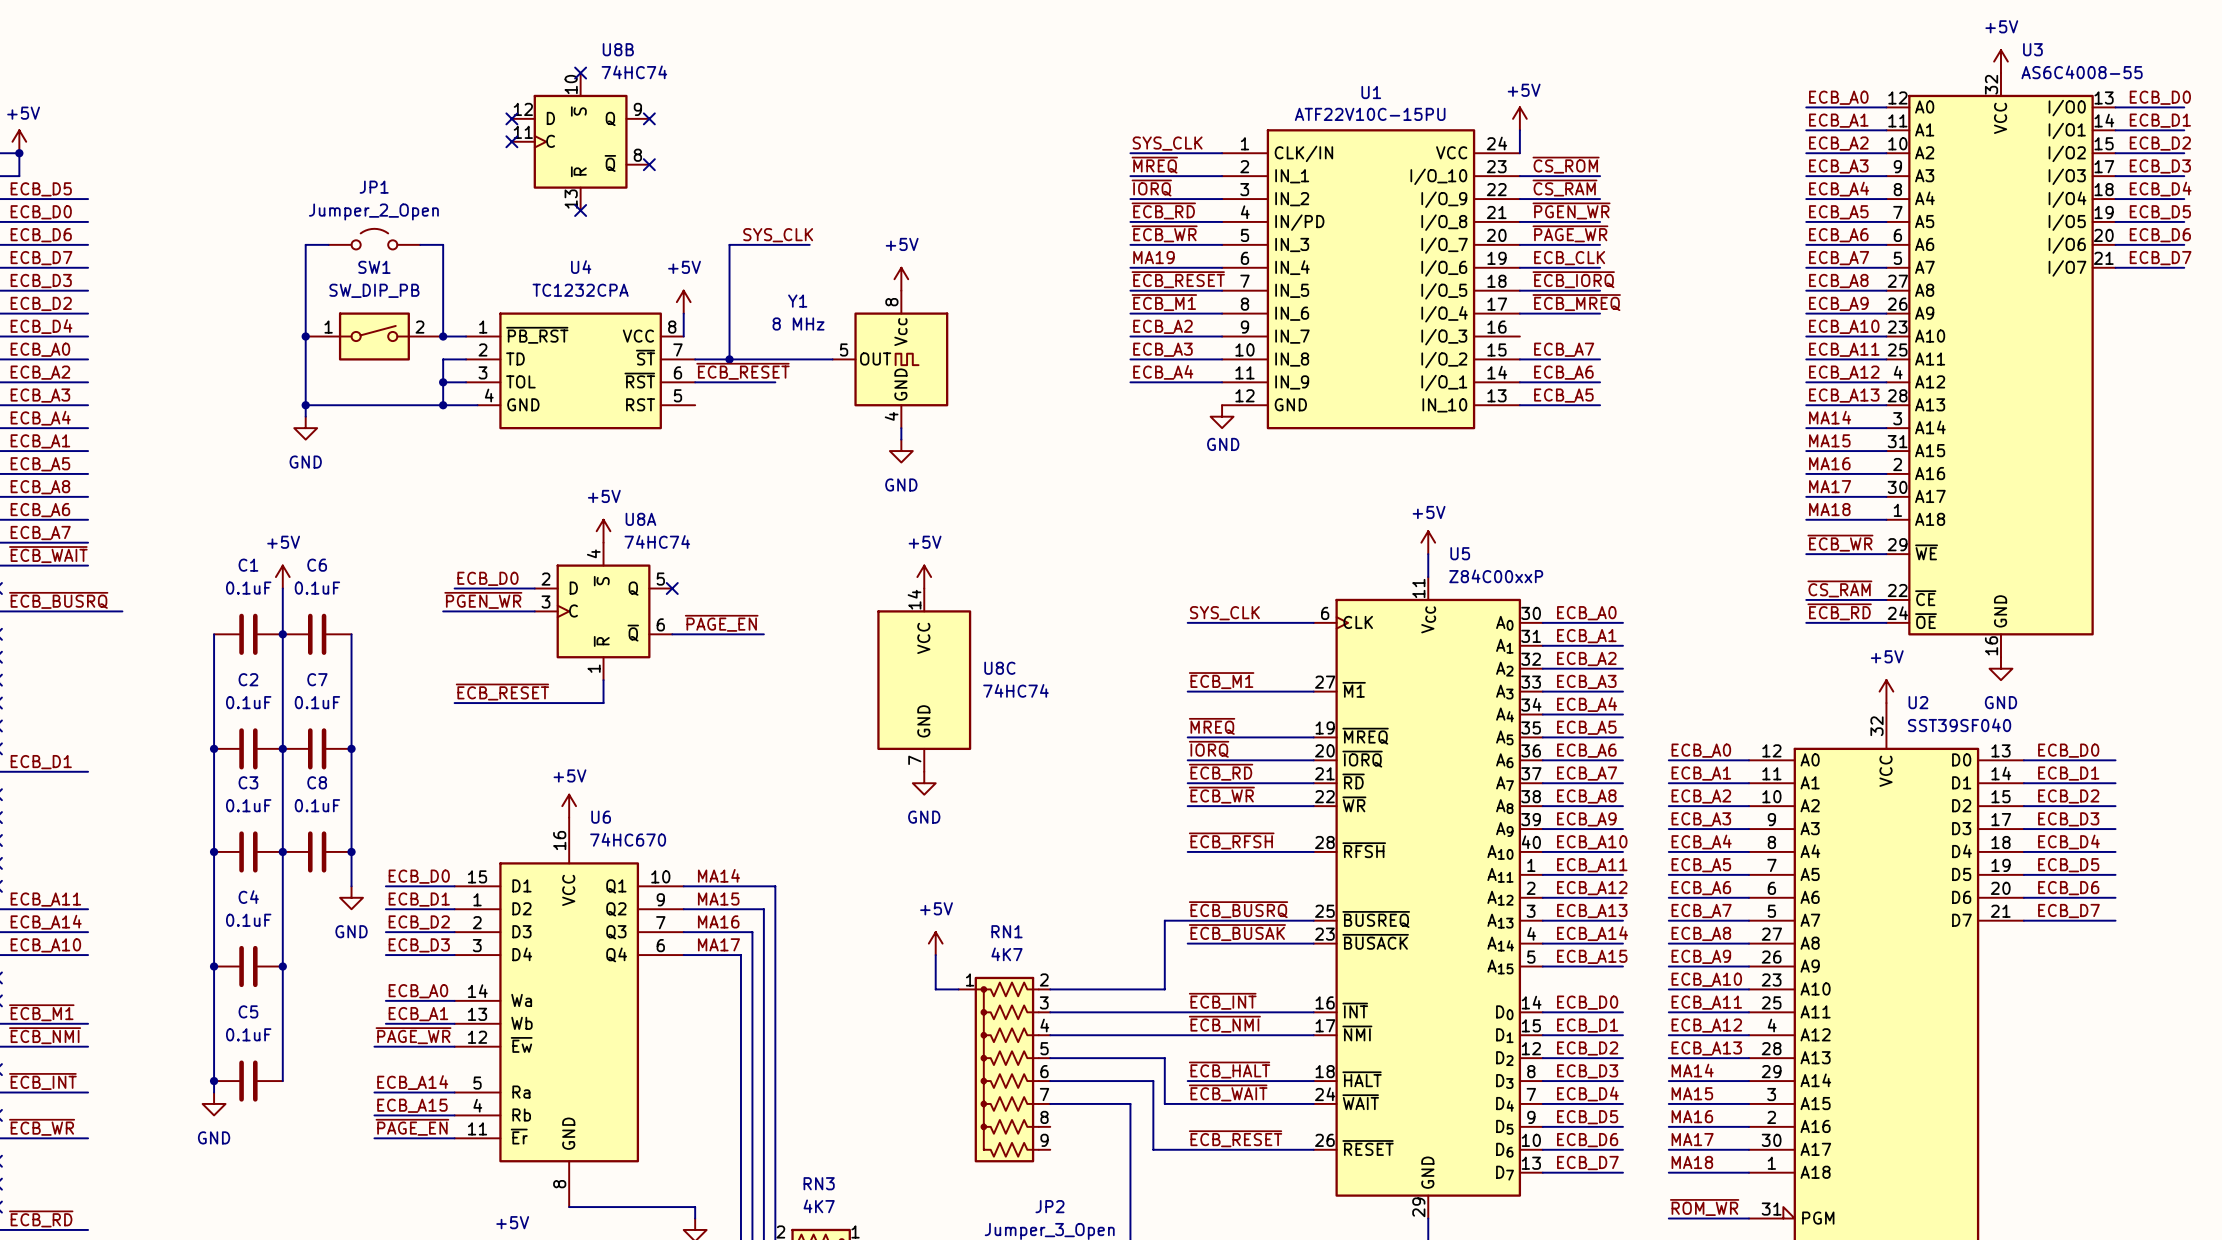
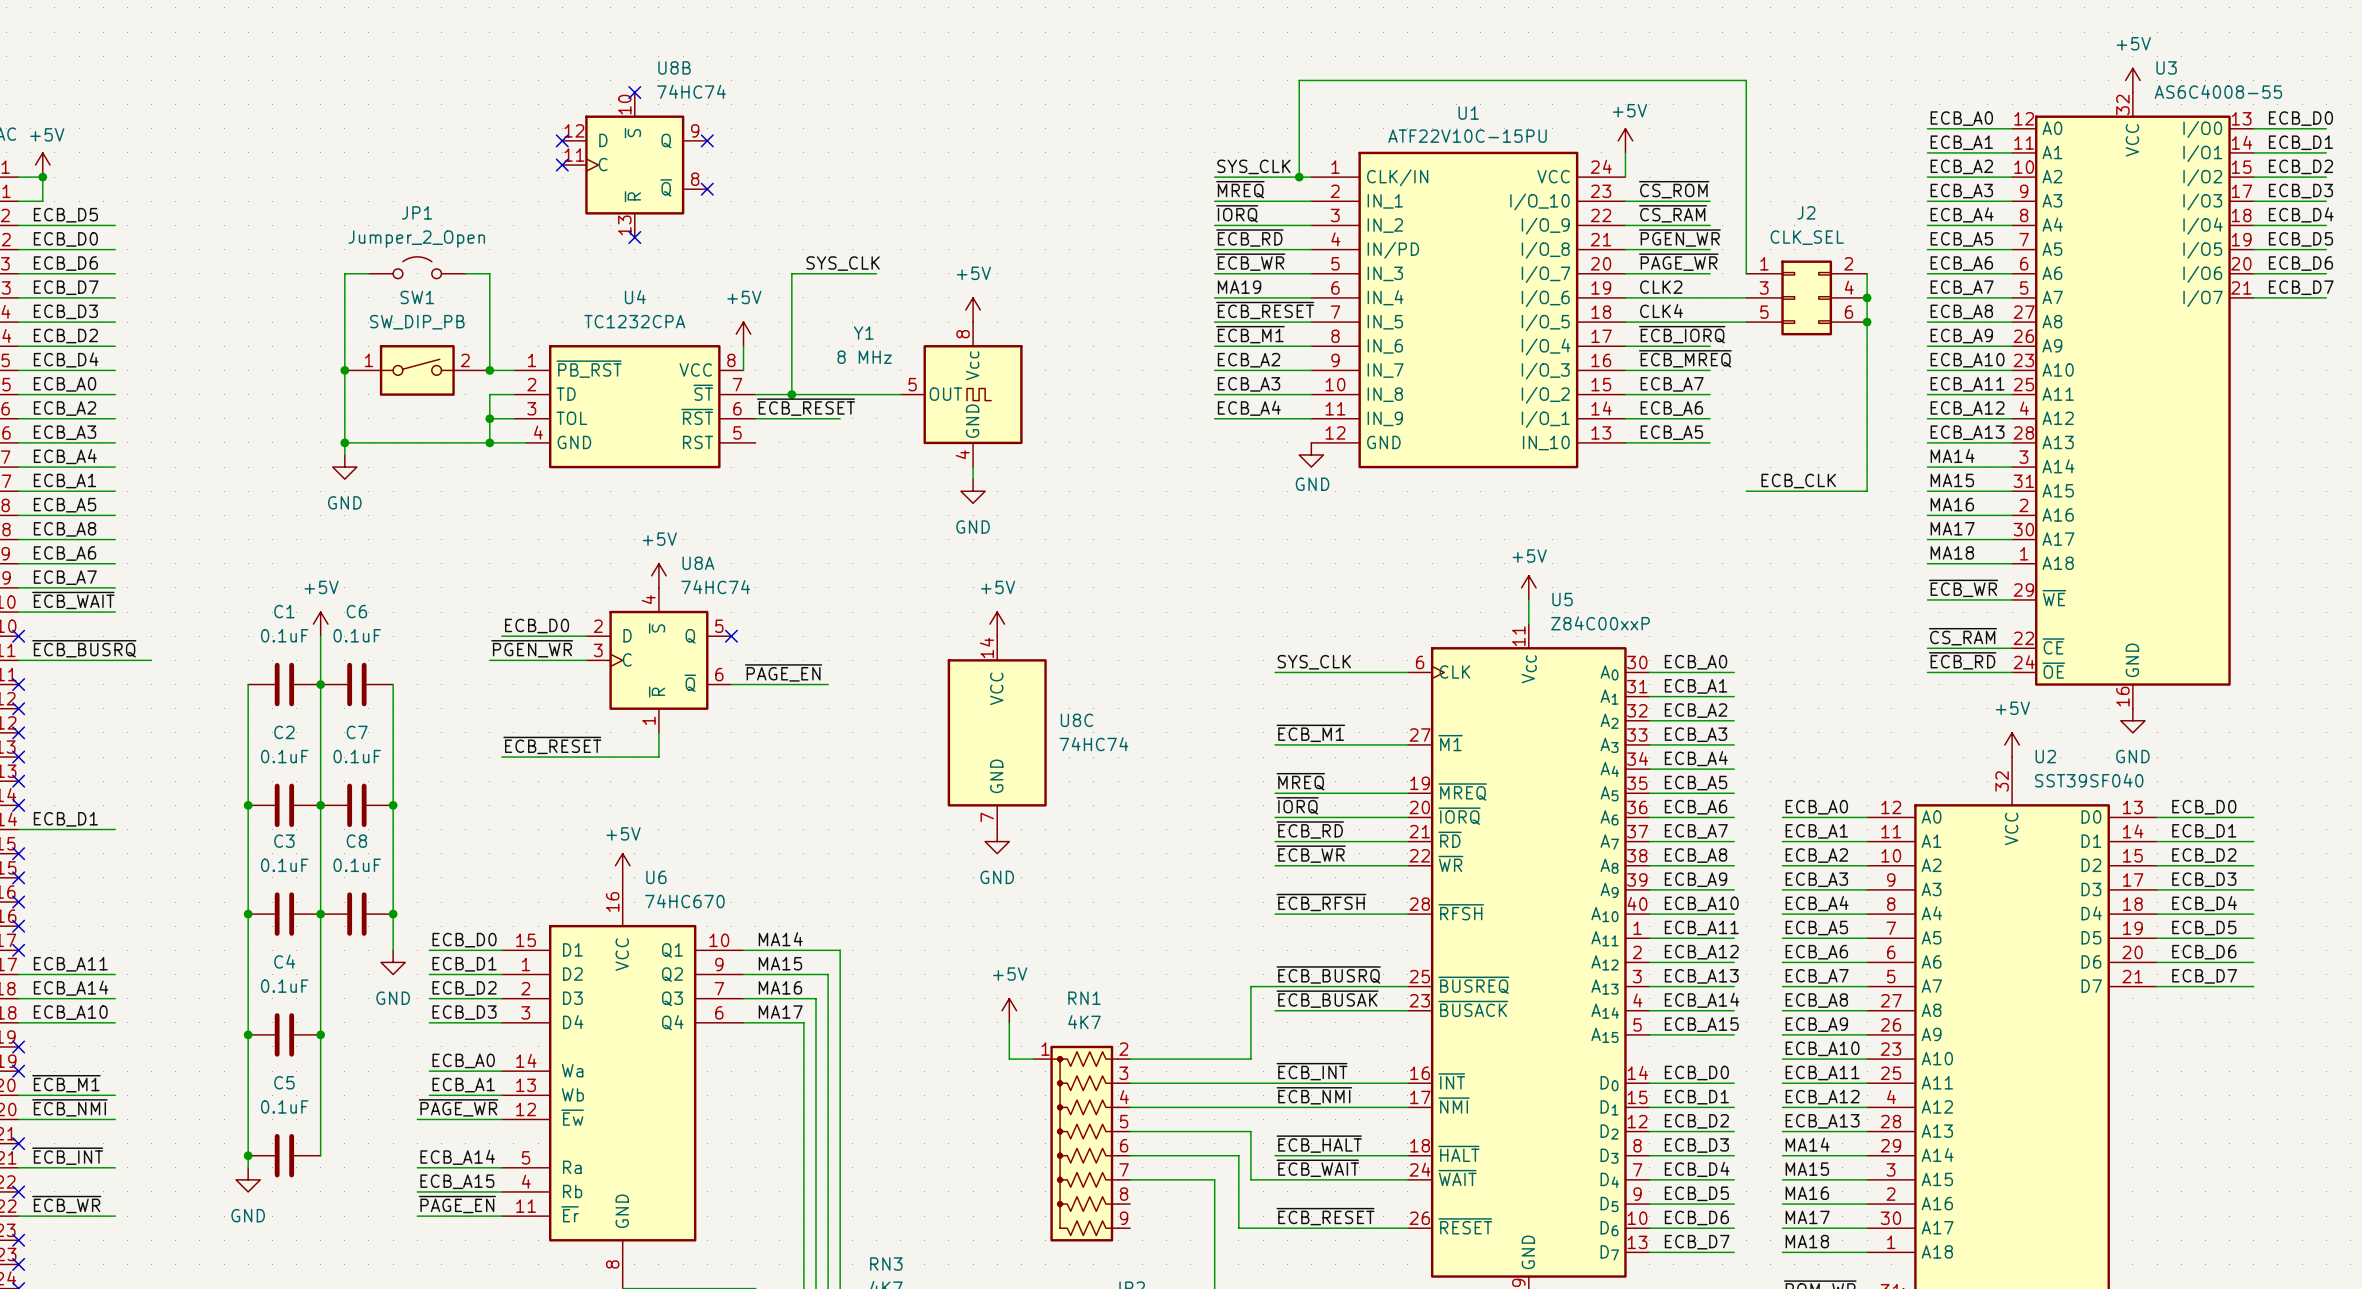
wire: none -> (1299, 177) (1299, 80) (1746, 80) (1746, 273)
junction: none -> (1299, 177)
wire: none -> (1867, 273) (1867, 491) (1746, 491)
label: ECB_CLK (1569, 258) -> CLK2 (1661, 287)
wire: none -> (1710, 297) (1746, 297)
J2: none -> CLK_SEL (1806, 297)
junction: none -> (1867, 297)
label: ~{ECB_IORQ} (1573, 279) -> CLK4 (1661, 311)
wire: none -> (1710, 322) (1746, 322)
junction: none -> (1867, 322)
label: ~{ECB_MREQ} (1576, 302) -> ~{ECB_IORQ} (1682, 334)
label: none -> ~{ECB_MREQ} (1685, 358)
wire: none -> (1625, 370) (1710, 370)
label: none -> ECB_CLK (1798, 481)

